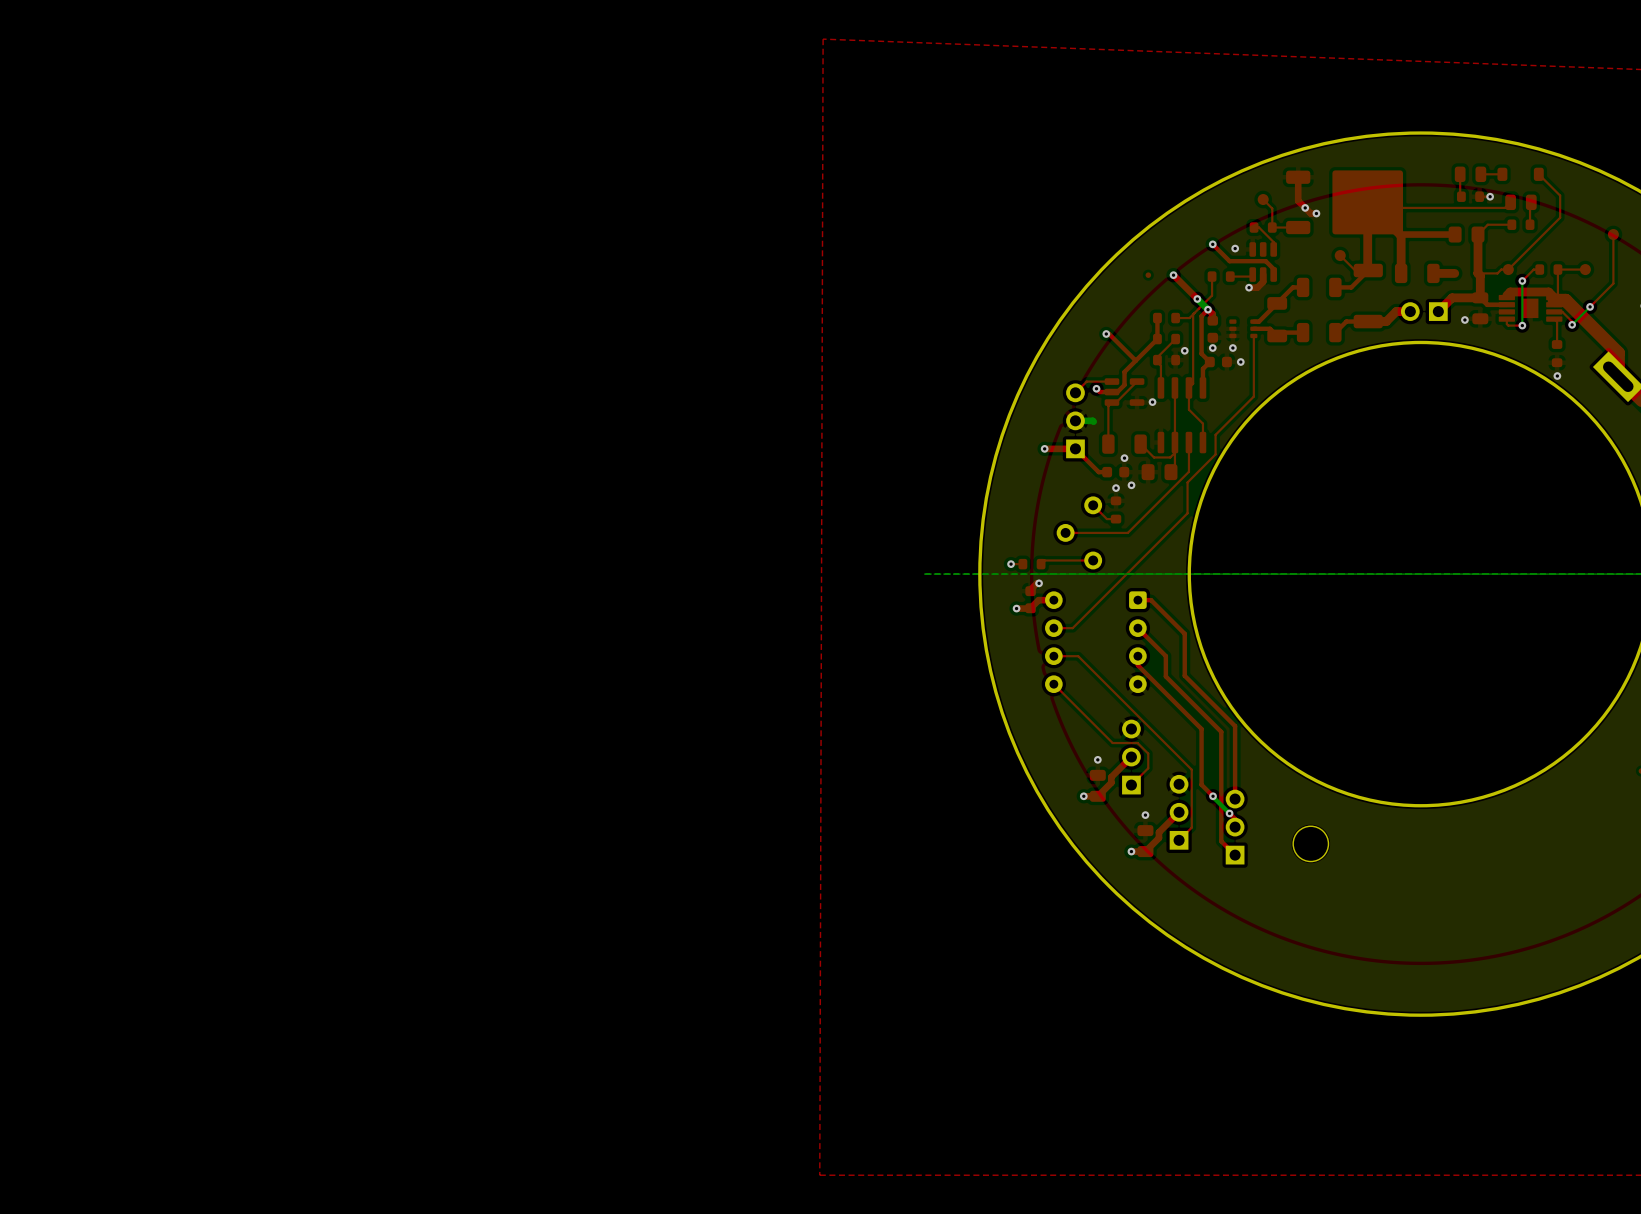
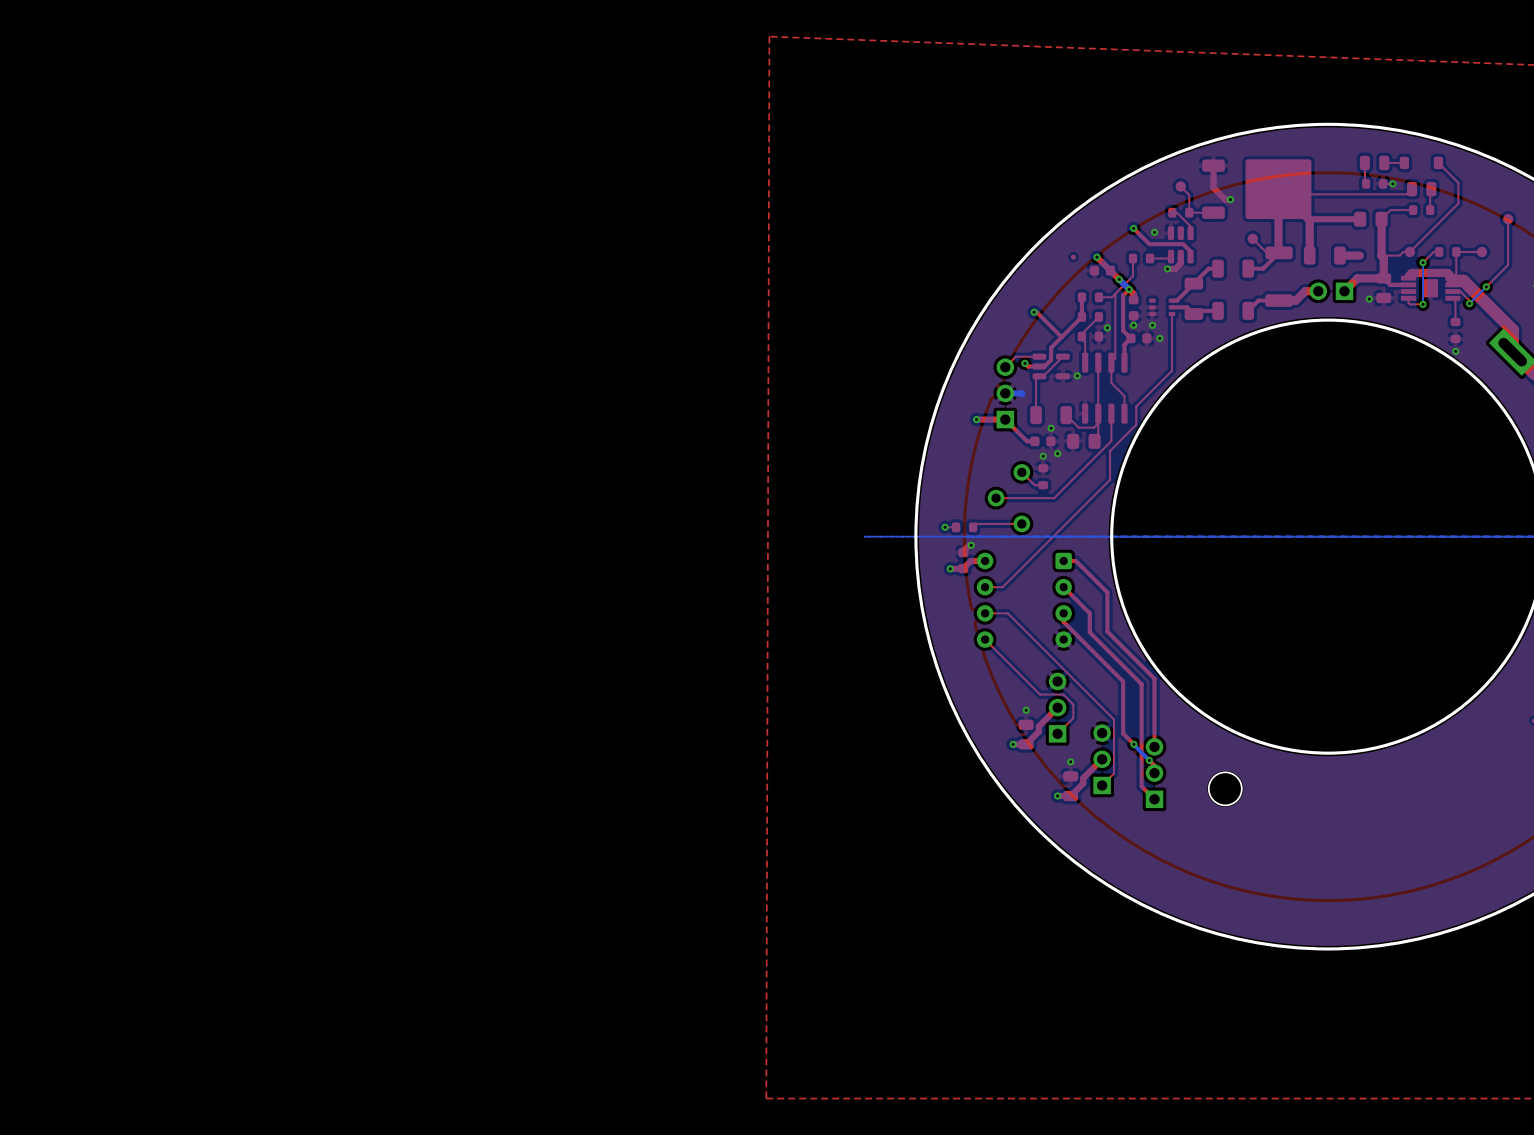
via: (1305, 207) -> none
part: none -> (1102, 270)

